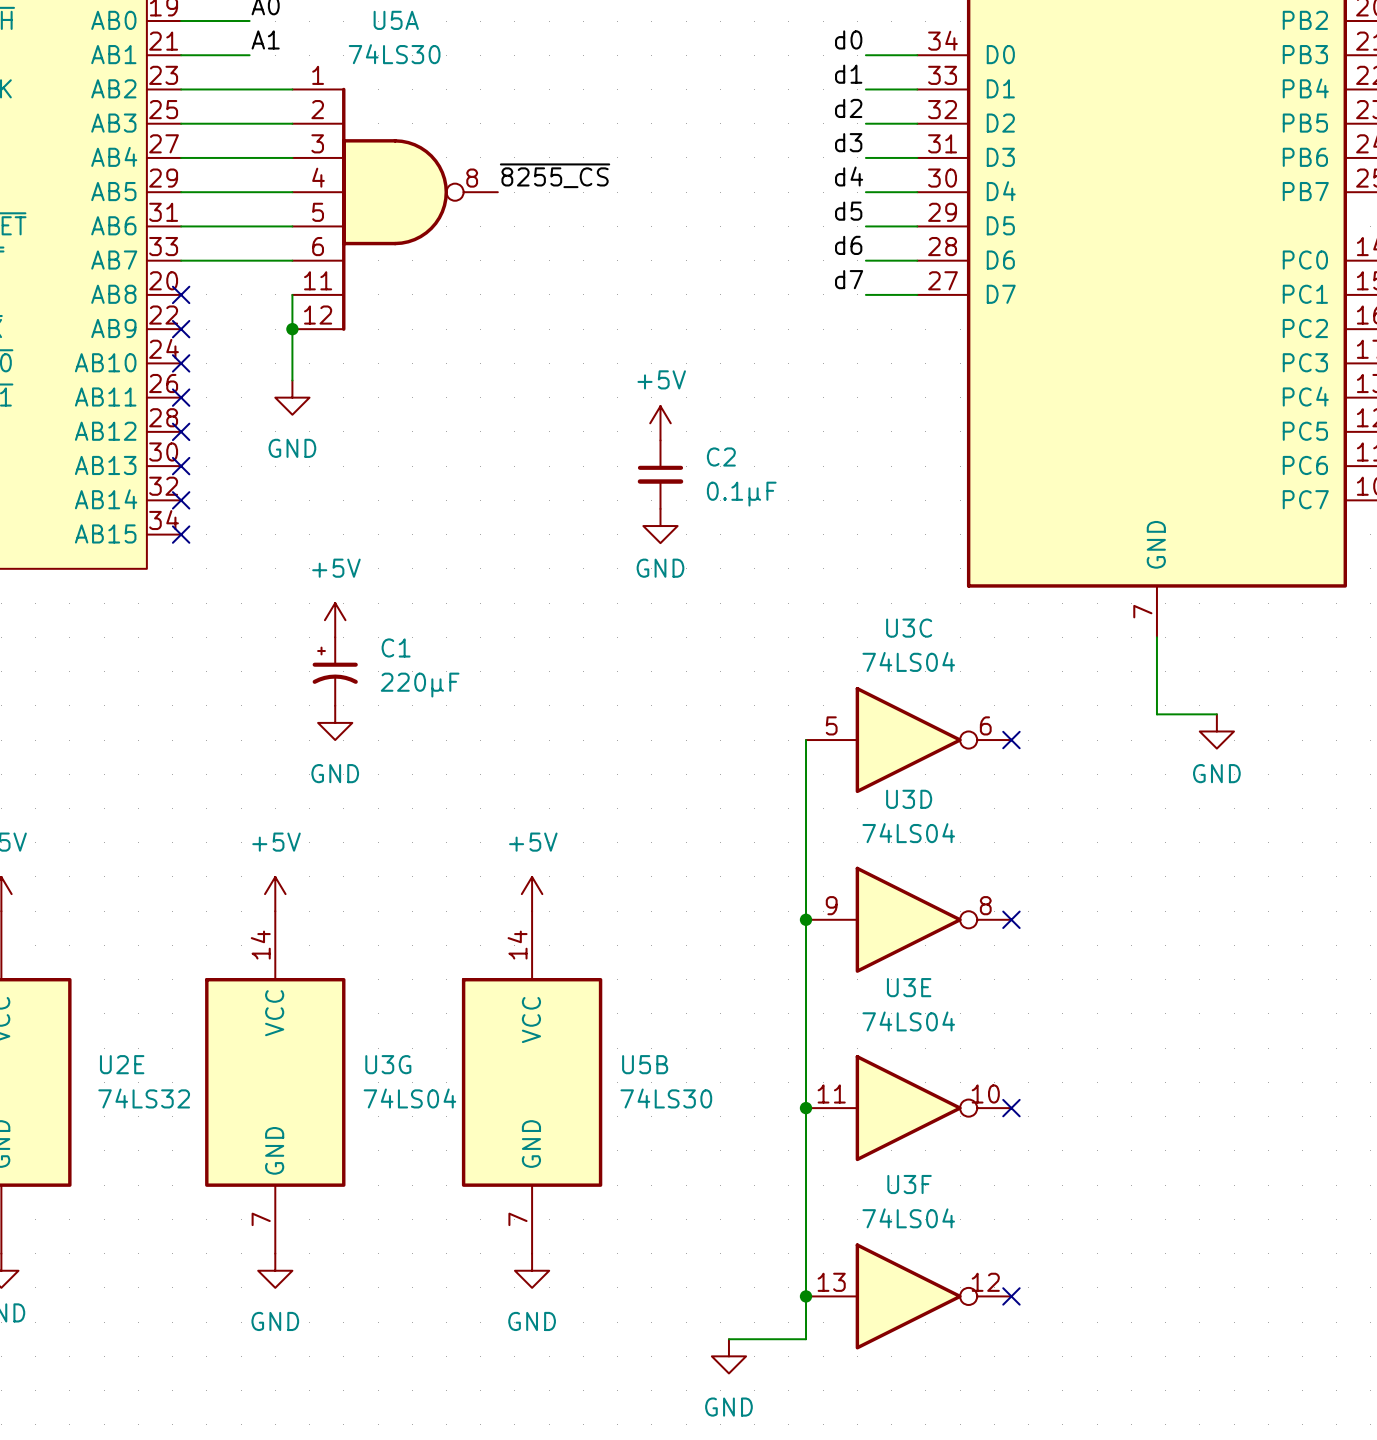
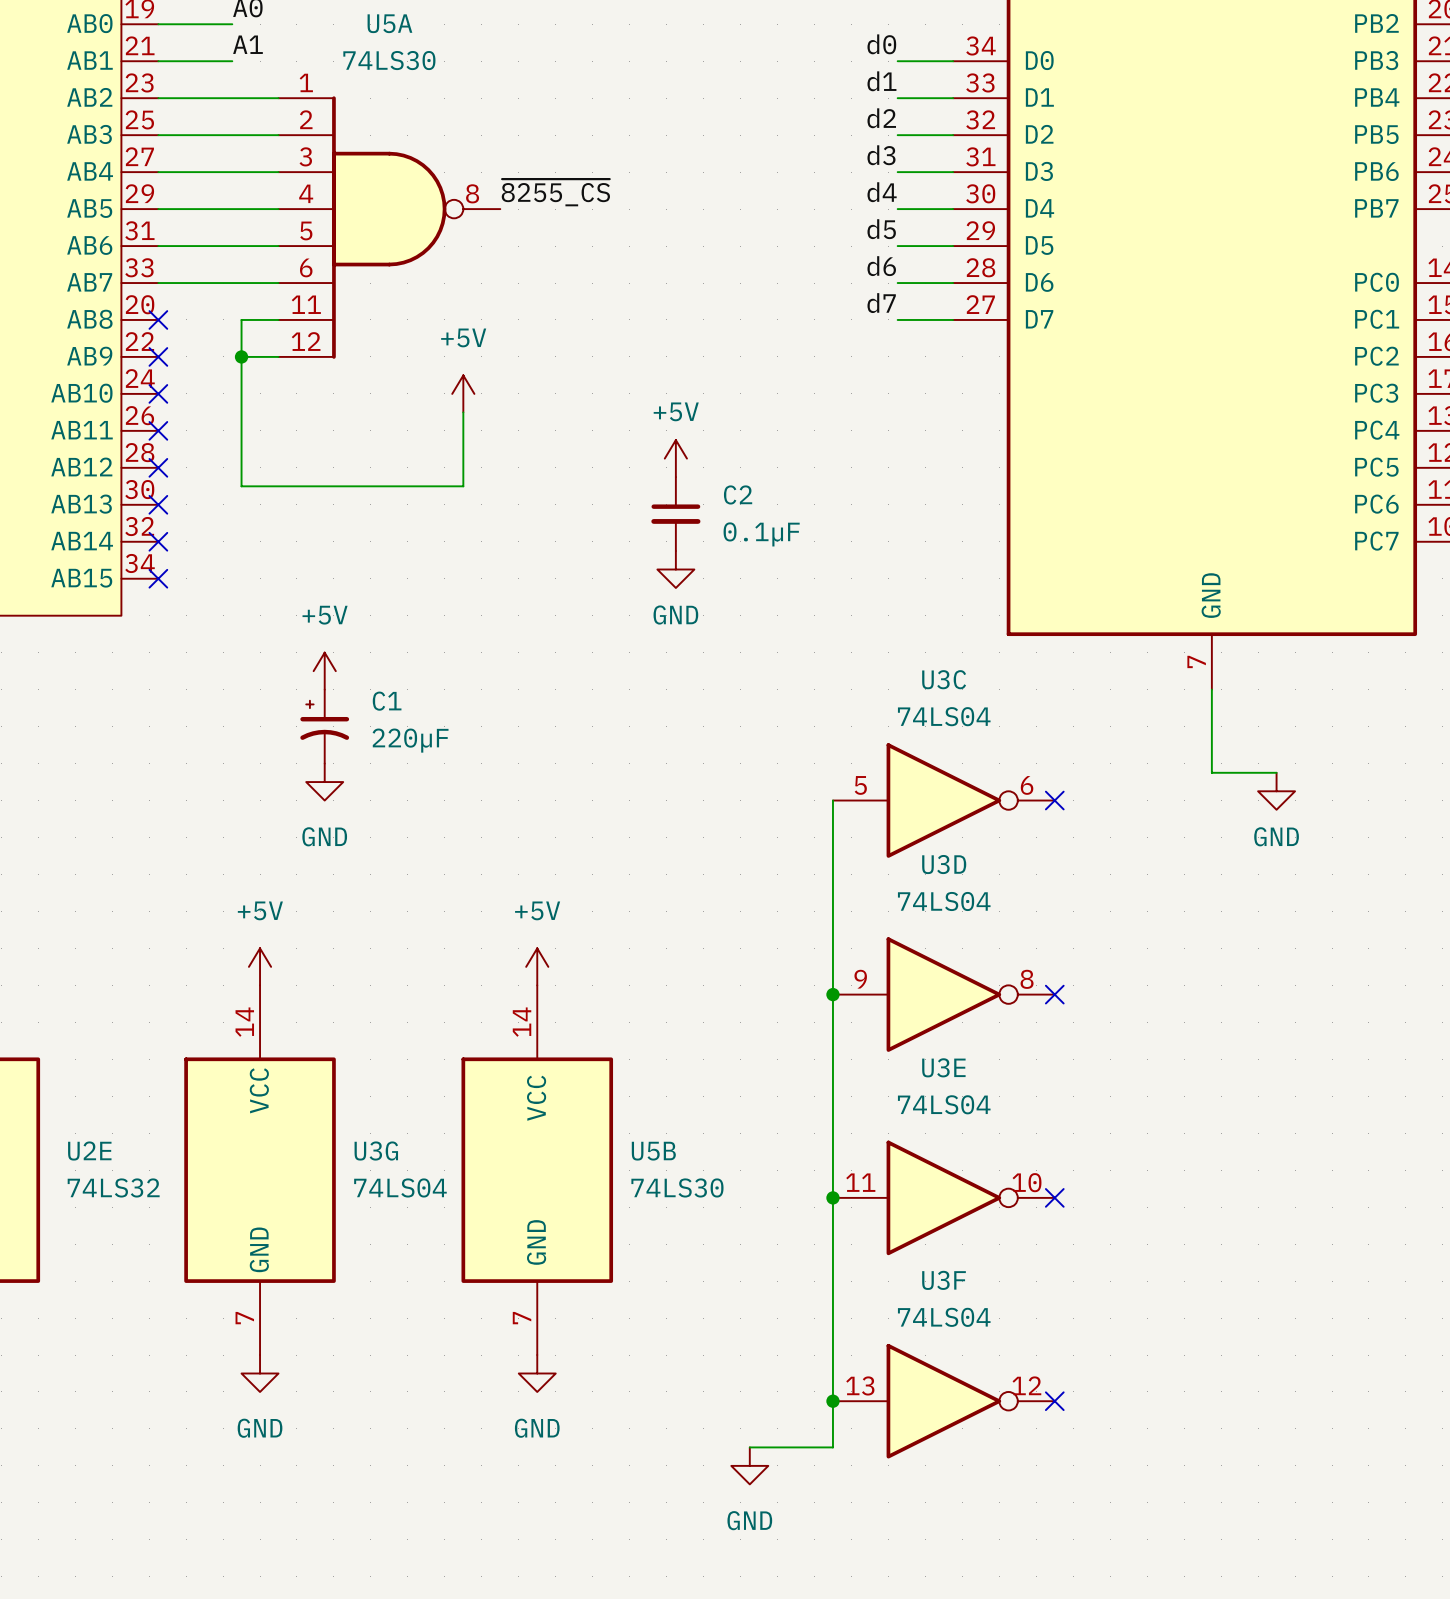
wire: (292, 294) (292, 380) -> (278, 319) (241, 319) (241, 486) (463, 486) (463, 412)
wire: none -> (241, 356) (278, 356)
junction position: (292, 329) -> (241, 356)
power symbol: none -> +5V (463, 393)
power symbol: GND (292, 397) -> none

